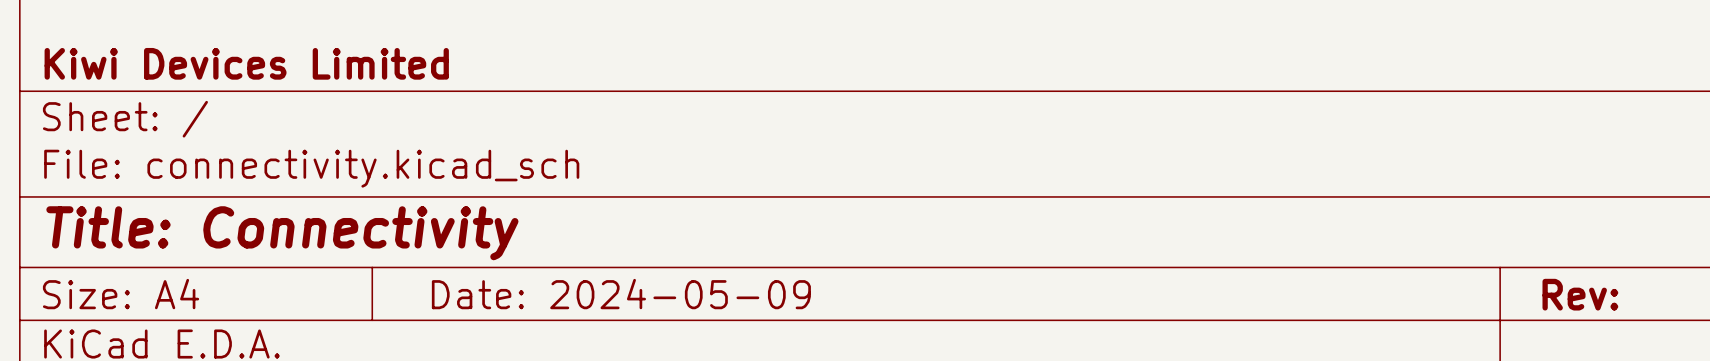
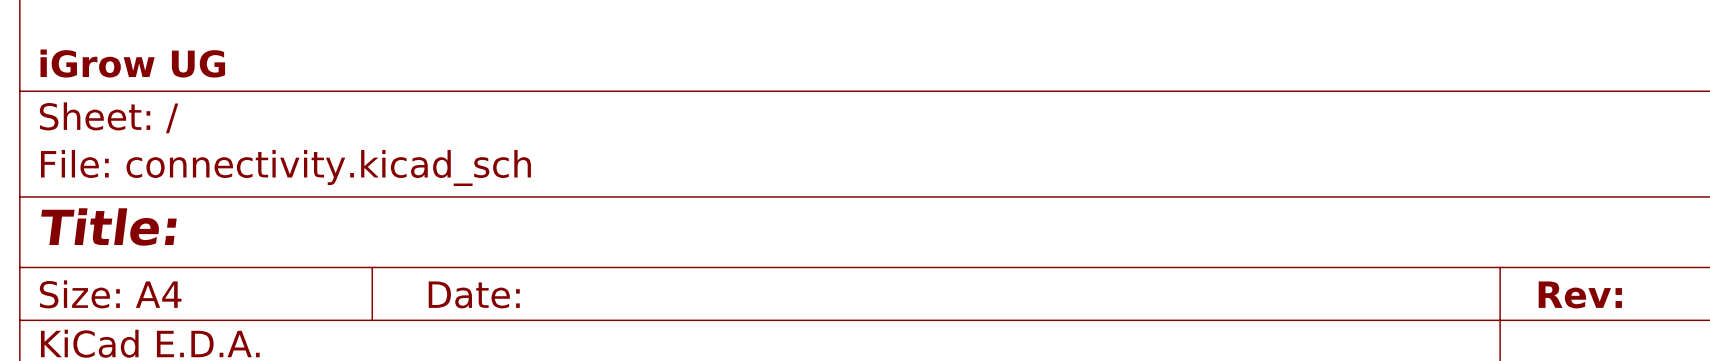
title block: Kiwi Devices Limited (246, 63) -> iGrow UG (132, 63)
title block: Title: Connectivity (282, 233) -> Title: (108, 226)
title block: Date: 2024-05-09 (621, 294) -> Date: (474, 294)

